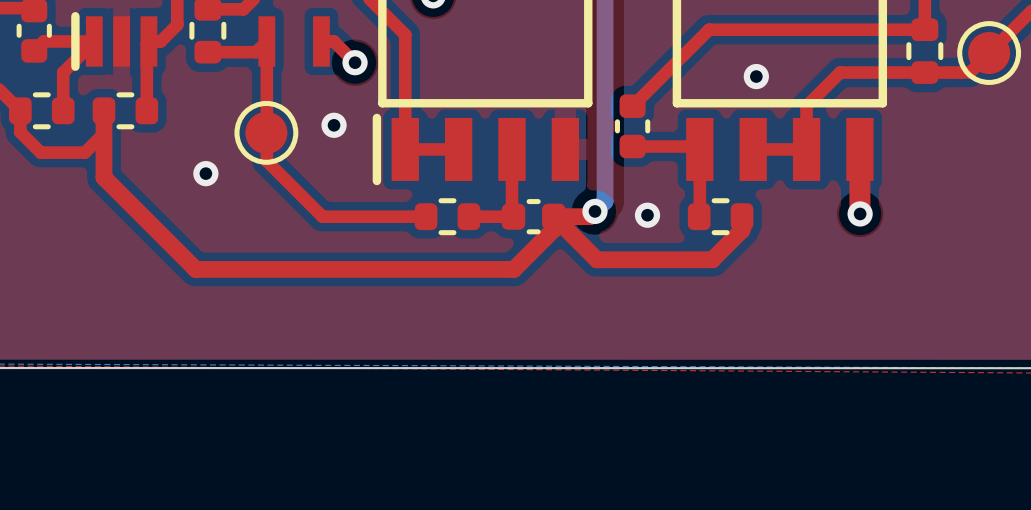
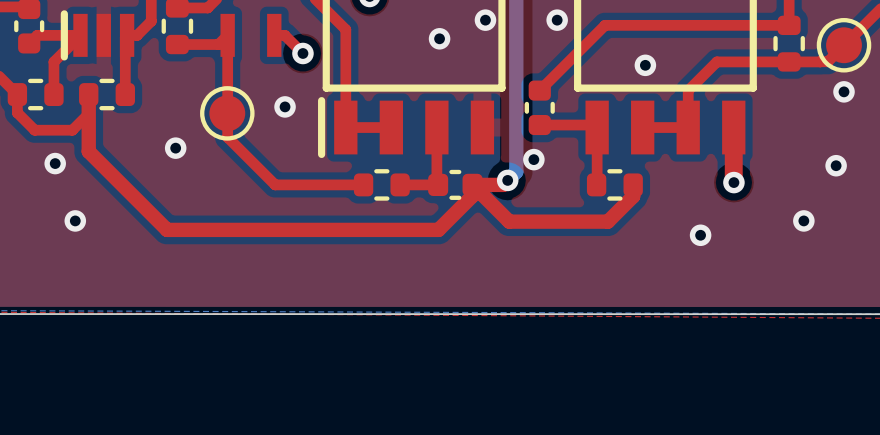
via: none -> (485, 20)
via: none -> (557, 20)
via: none -> (439, 38)
via: none -> (844, 91)
via: none -> (55, 163)
via: none -> (836, 165)
via position: (647, 215) -> (533, 159)
via: none -> (75, 220)
via: none -> (803, 220)
via: none -> (700, 235)

